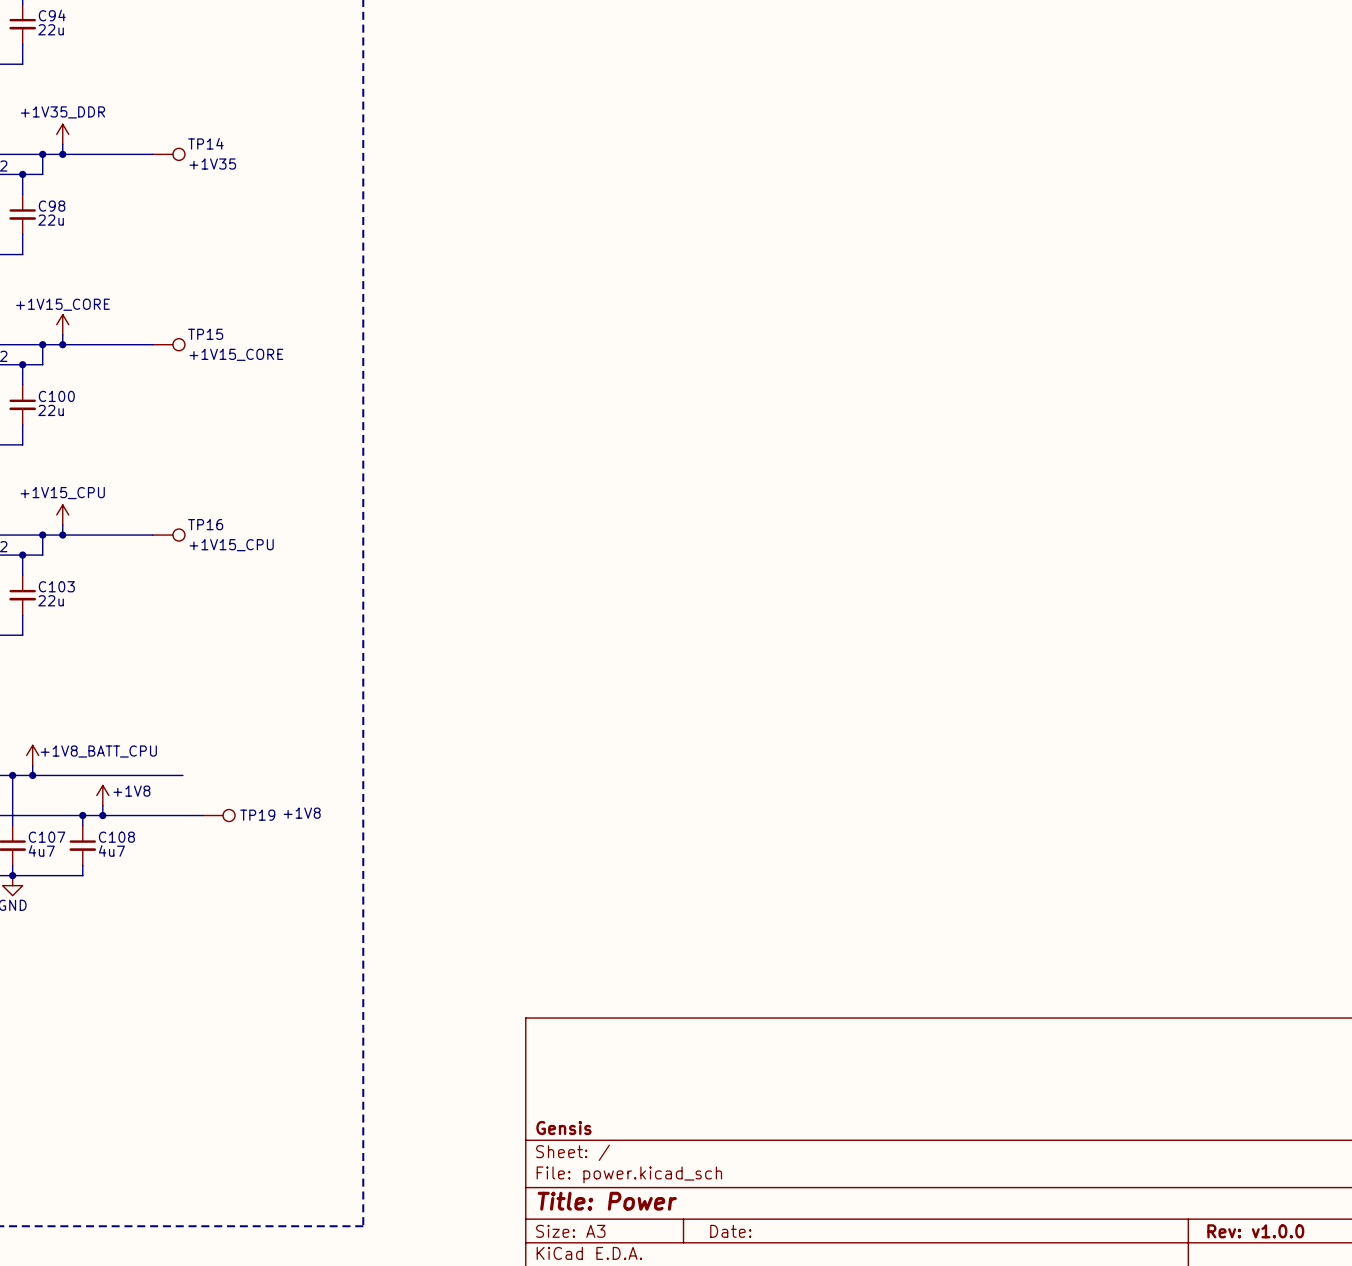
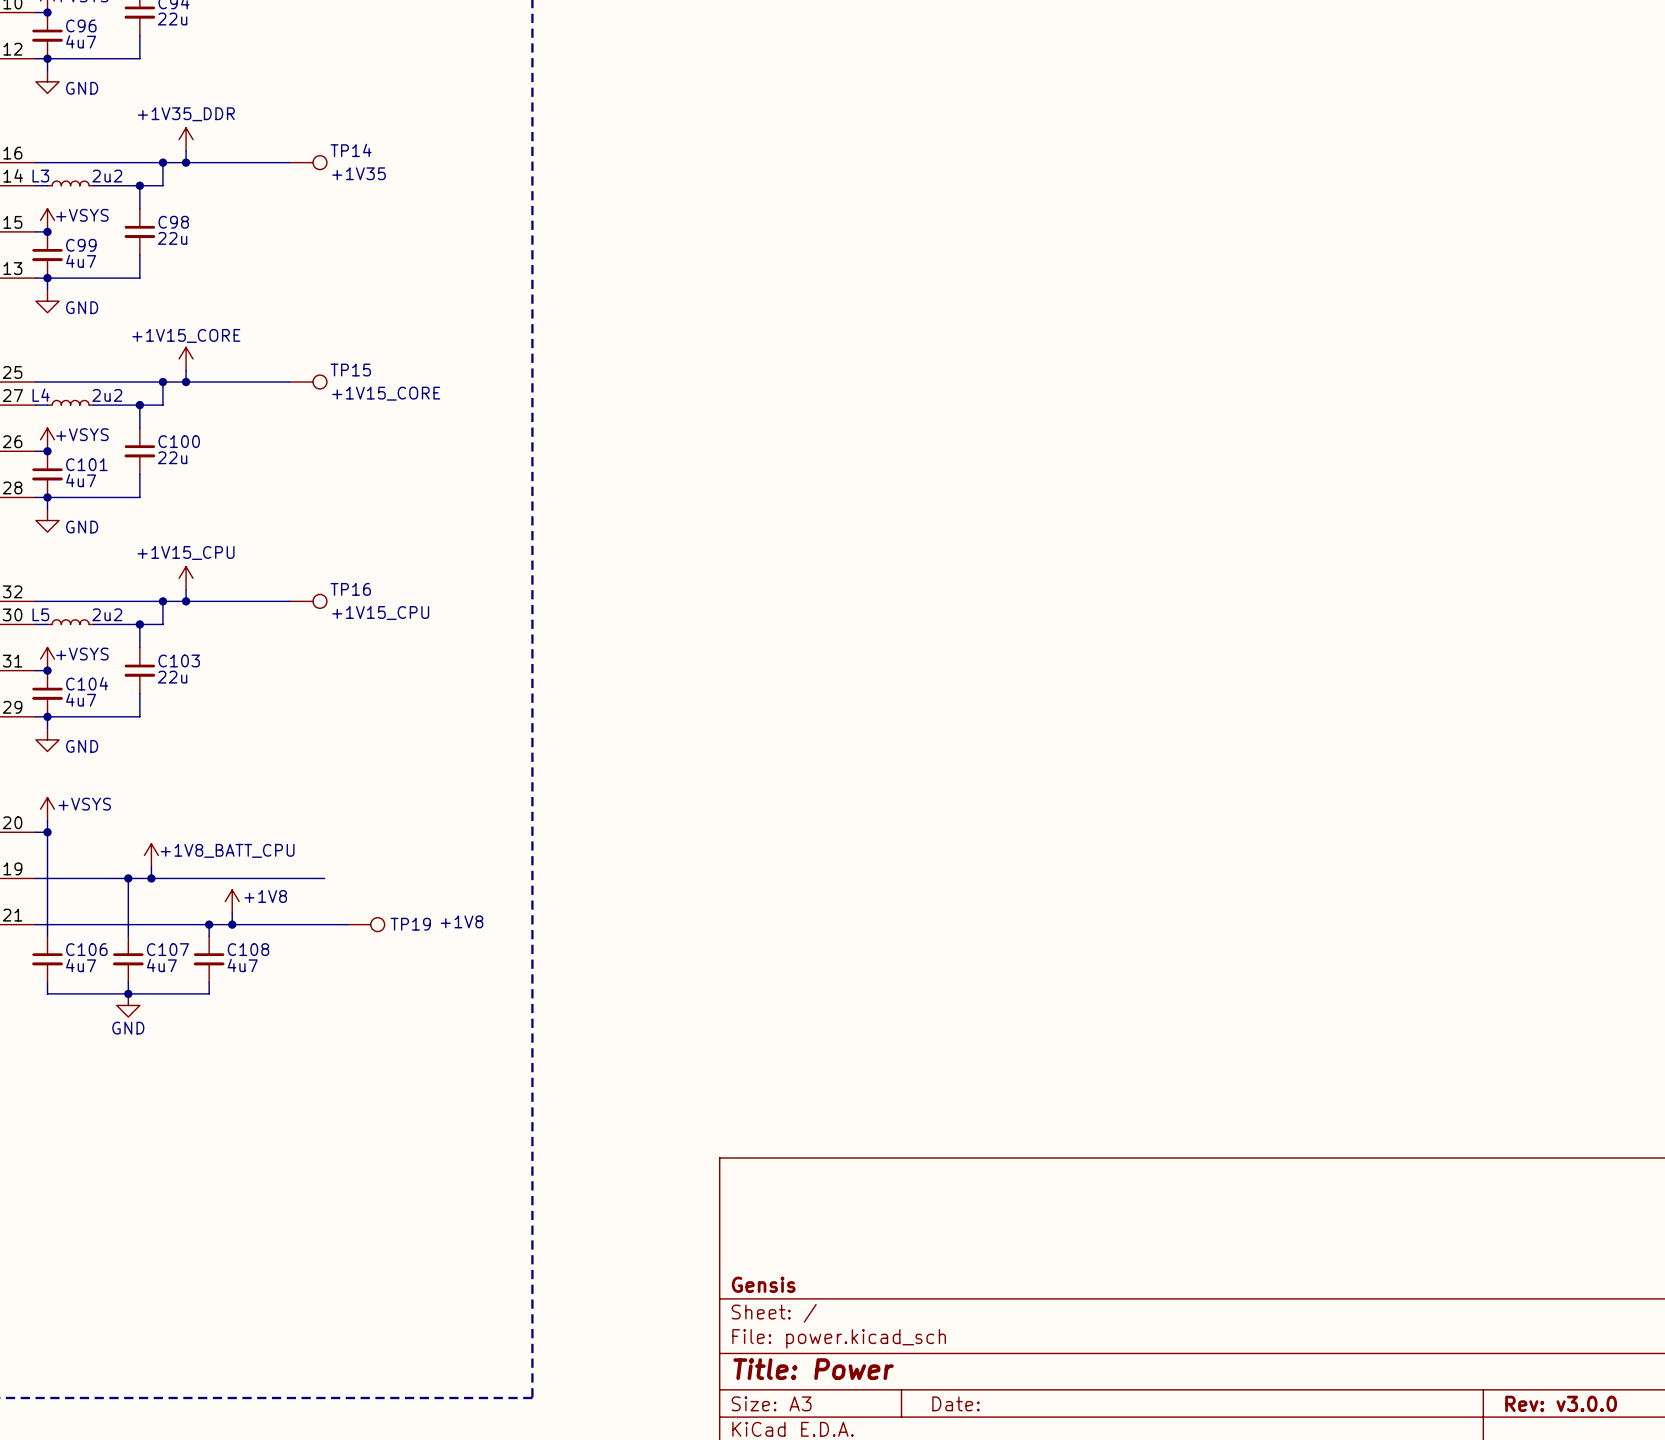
title block: Rev: v1.0.0 (1255, 1231) -> Rev: v3.0.0 (1561, 1403)

